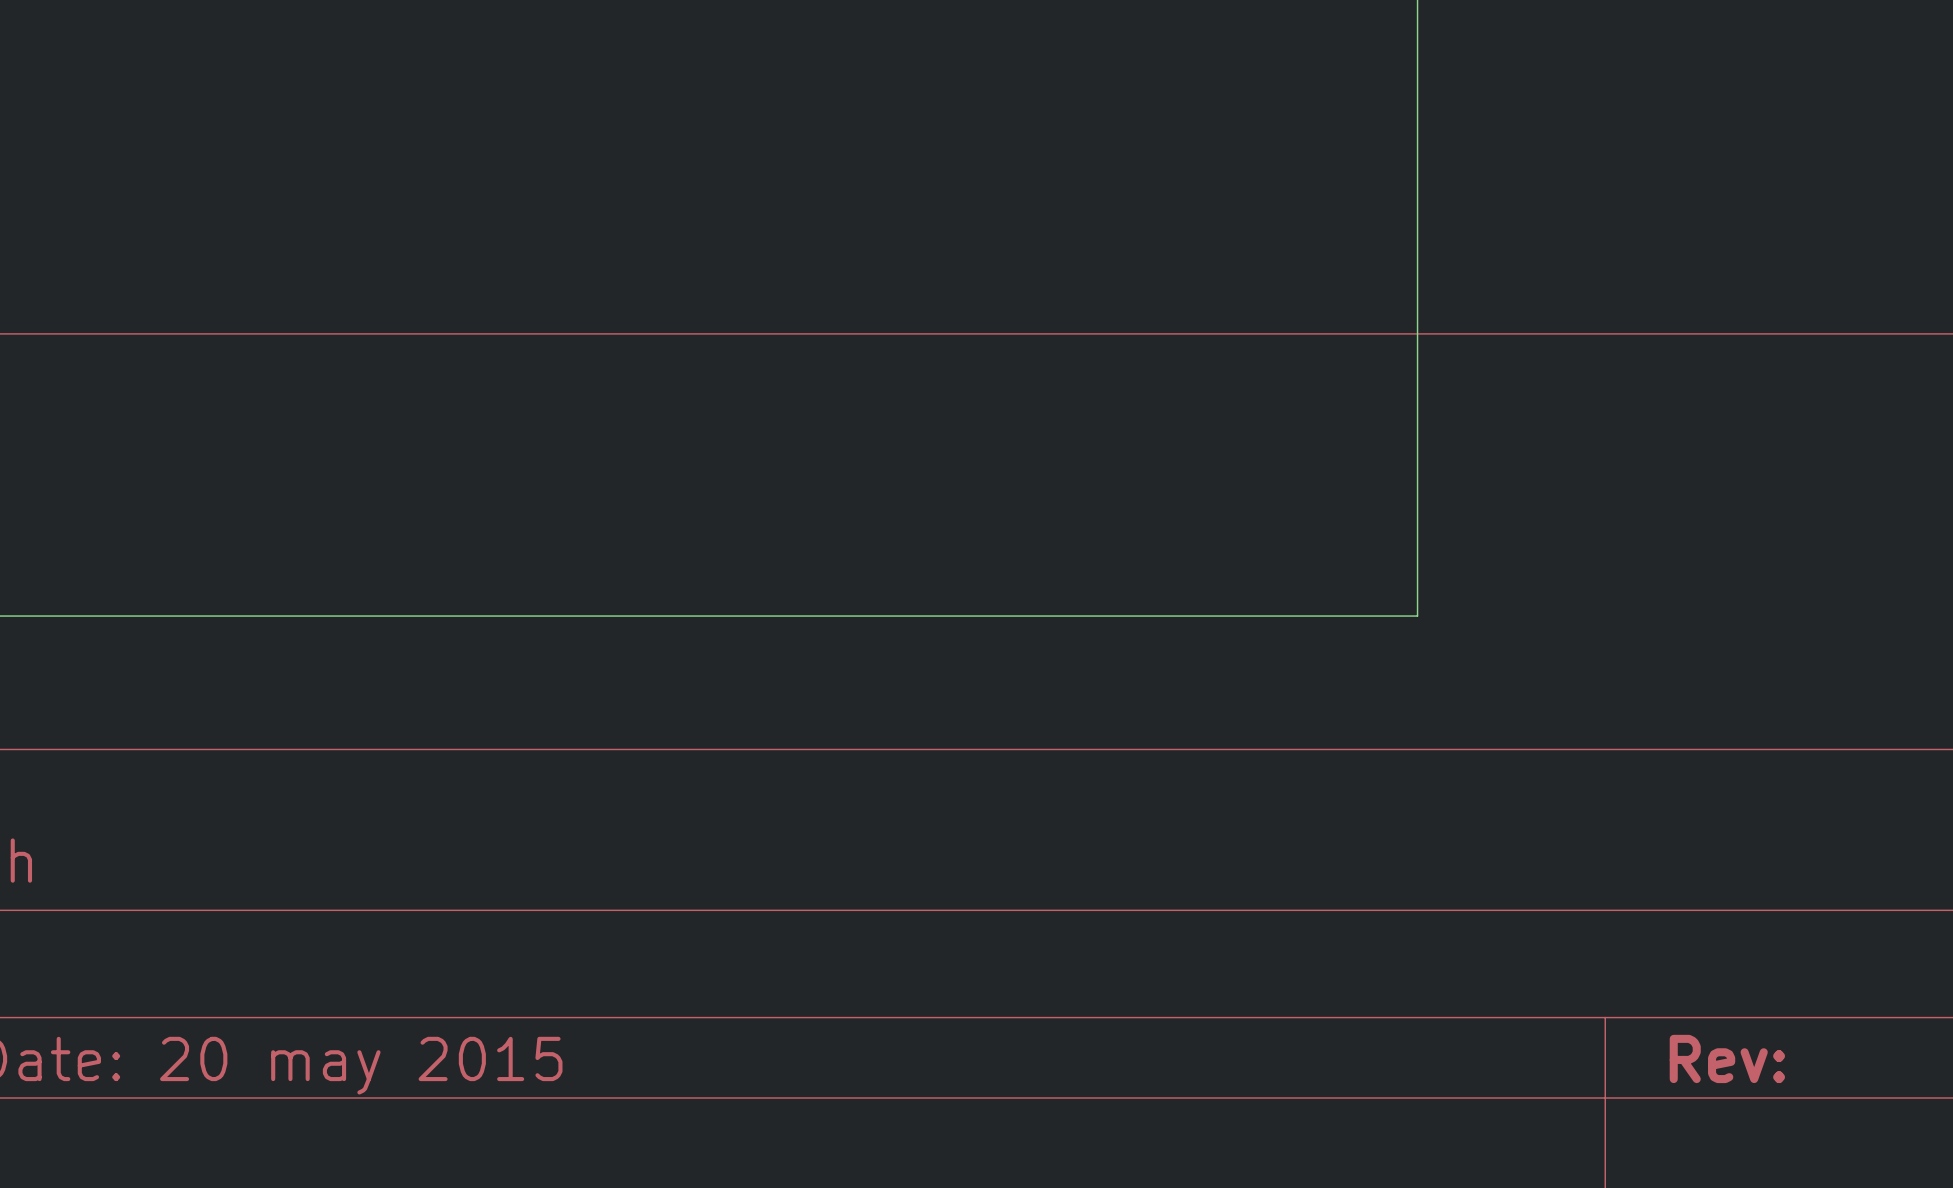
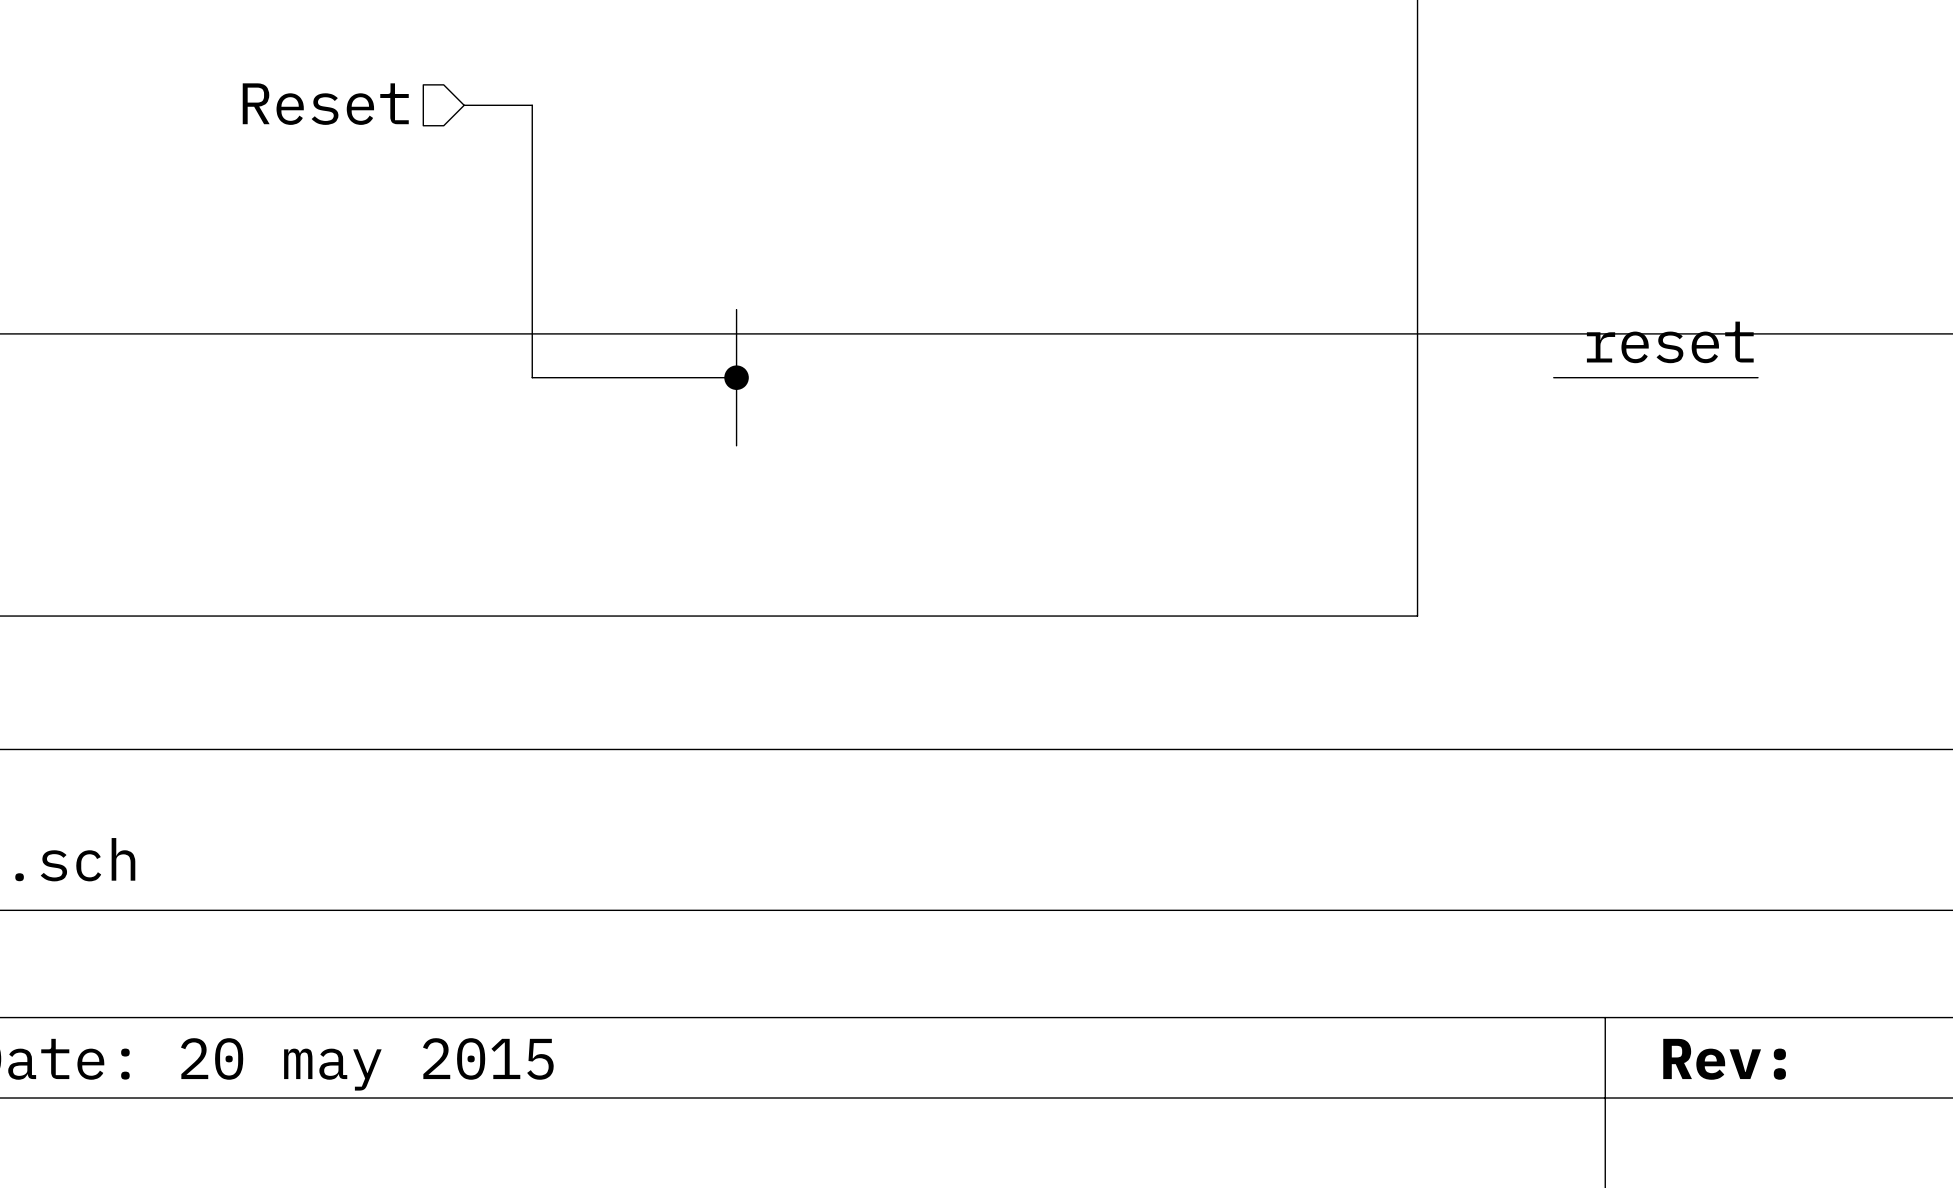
sheet pin: none -> Reset (325, 104)
wire: none -> (464, 105) (532, 105) (532, 377) (736, 377)
wire: none -> (736, 309) (736, 445)
label: none -> reset (1670, 342)
junction: none -> (736, 377)
wire: none -> (1553, 377) (1758, 377)

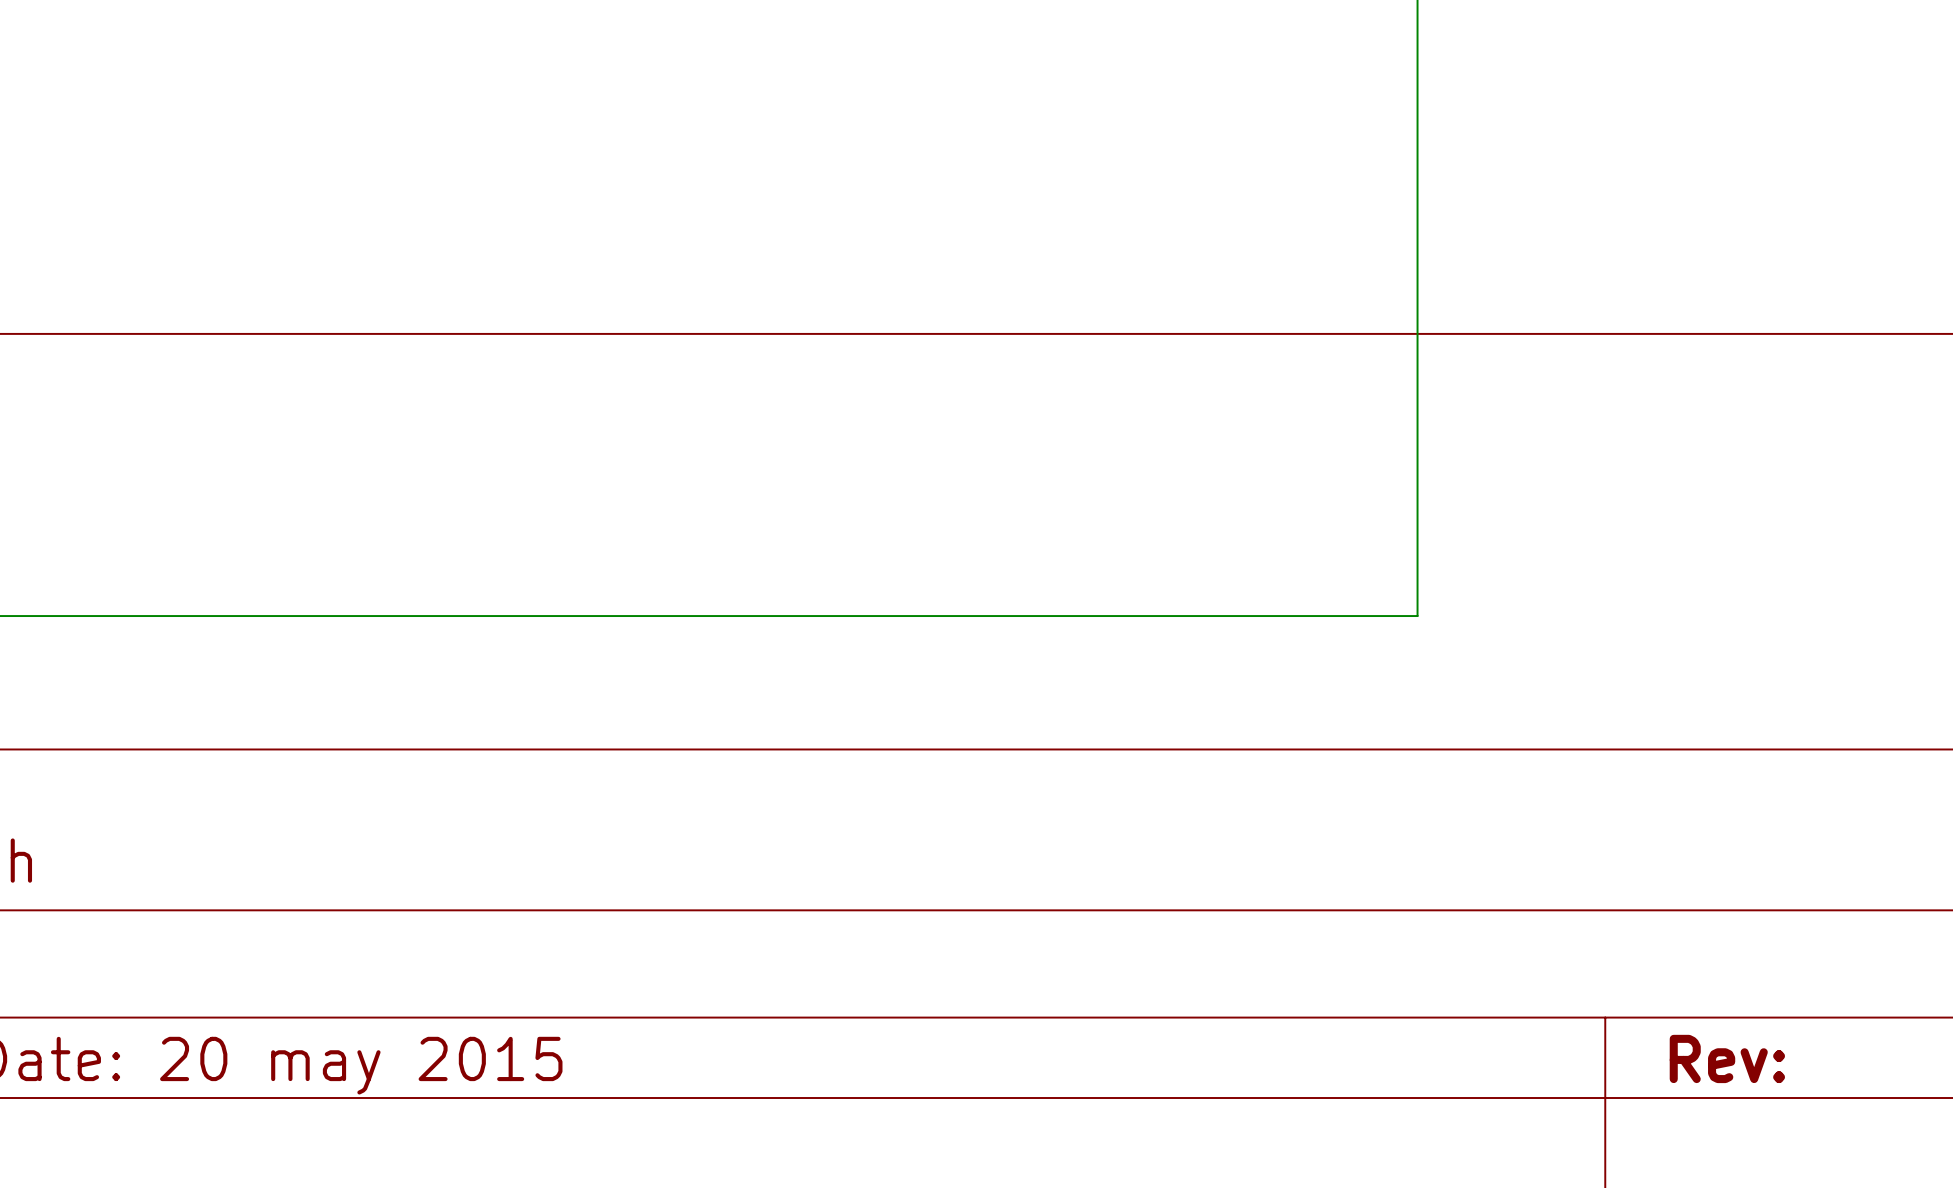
sheet pin: Reset (325, 104) -> none
wire: (464, 105) (532, 105) (532, 377) (736, 377) -> none
wire: (736, 309) (736, 445) -> none
label: reset (1670, 342) -> none
junction: (736, 377) -> none
wire: (1553, 377) (1758, 377) -> none

